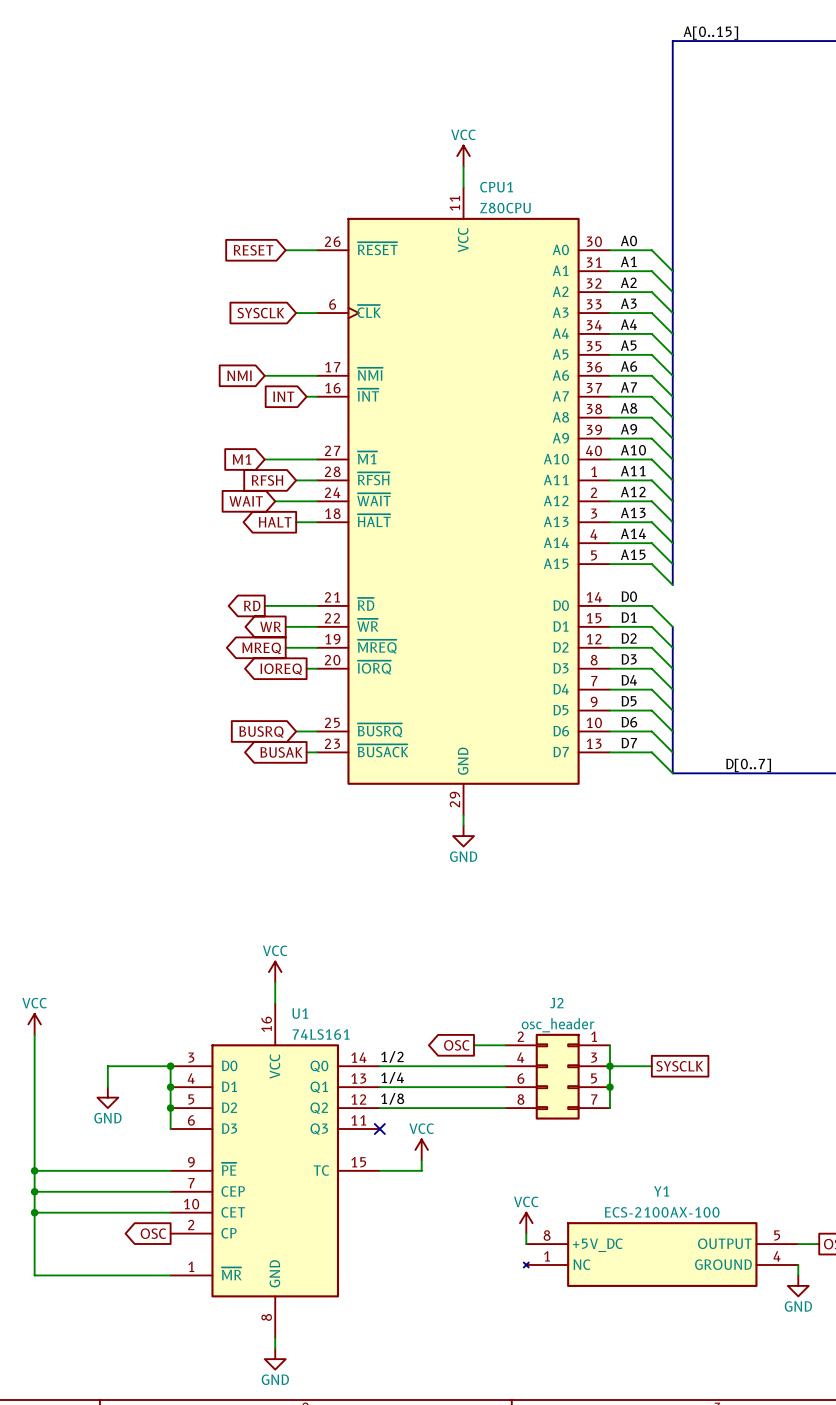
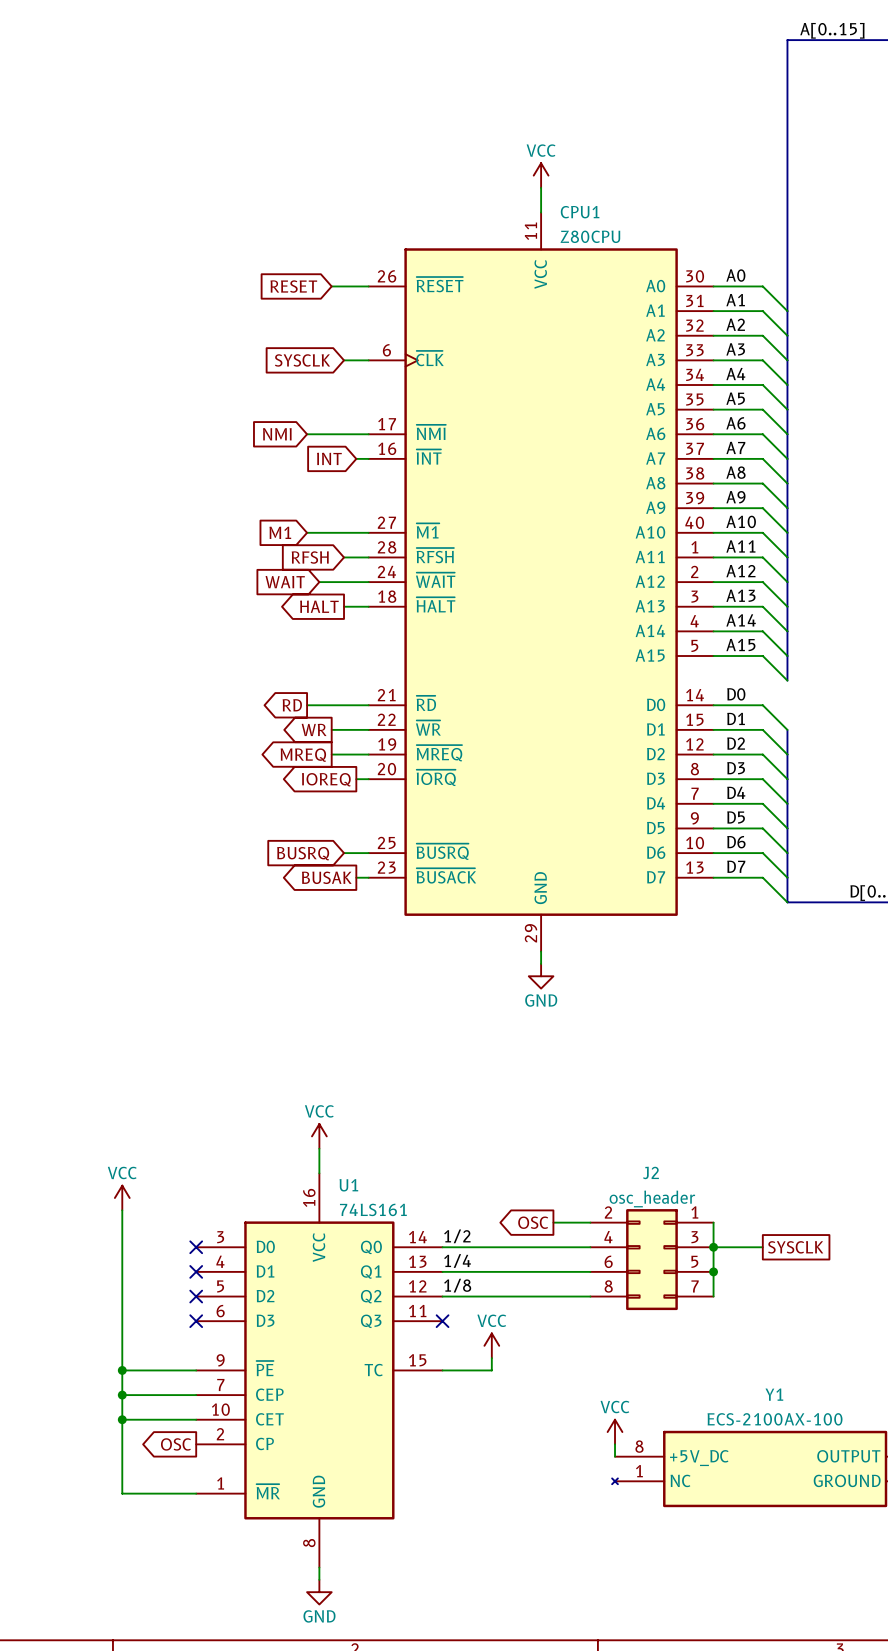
power symbol position: VCC (34, 1024) -> VCC (122, 1198)
wire: (34, 1034) (34, 1275) (107, 1275) -> (122, 1271) (122, 1493)
wire: (107, 1066) (170, 1066) (170, 1129) -> (122, 1247) (122, 1210)
junction: (170, 1066) -> none
no-connect mark: none -> (196, 1247)
junction: (170, 1087) -> none
no-connect mark: none -> (196, 1271)
power symbol: GND (107, 1097) -> none
junction: (170, 1108) -> none
no-connect mark: none -> (196, 1296)
no-connect mark: none -> (196, 1321)
wire: (34, 1170) (107, 1170) -> none
junction: (34, 1170) -> none
junction: none -> (122, 1370)
wire: (34, 1191) (107, 1191) -> none
junction: (34, 1191) -> none
junction: none -> (122, 1395)
wire: (34, 1212) (107, 1212) -> none
junction: (34, 1212) -> none
junction: none -> (122, 1419)

